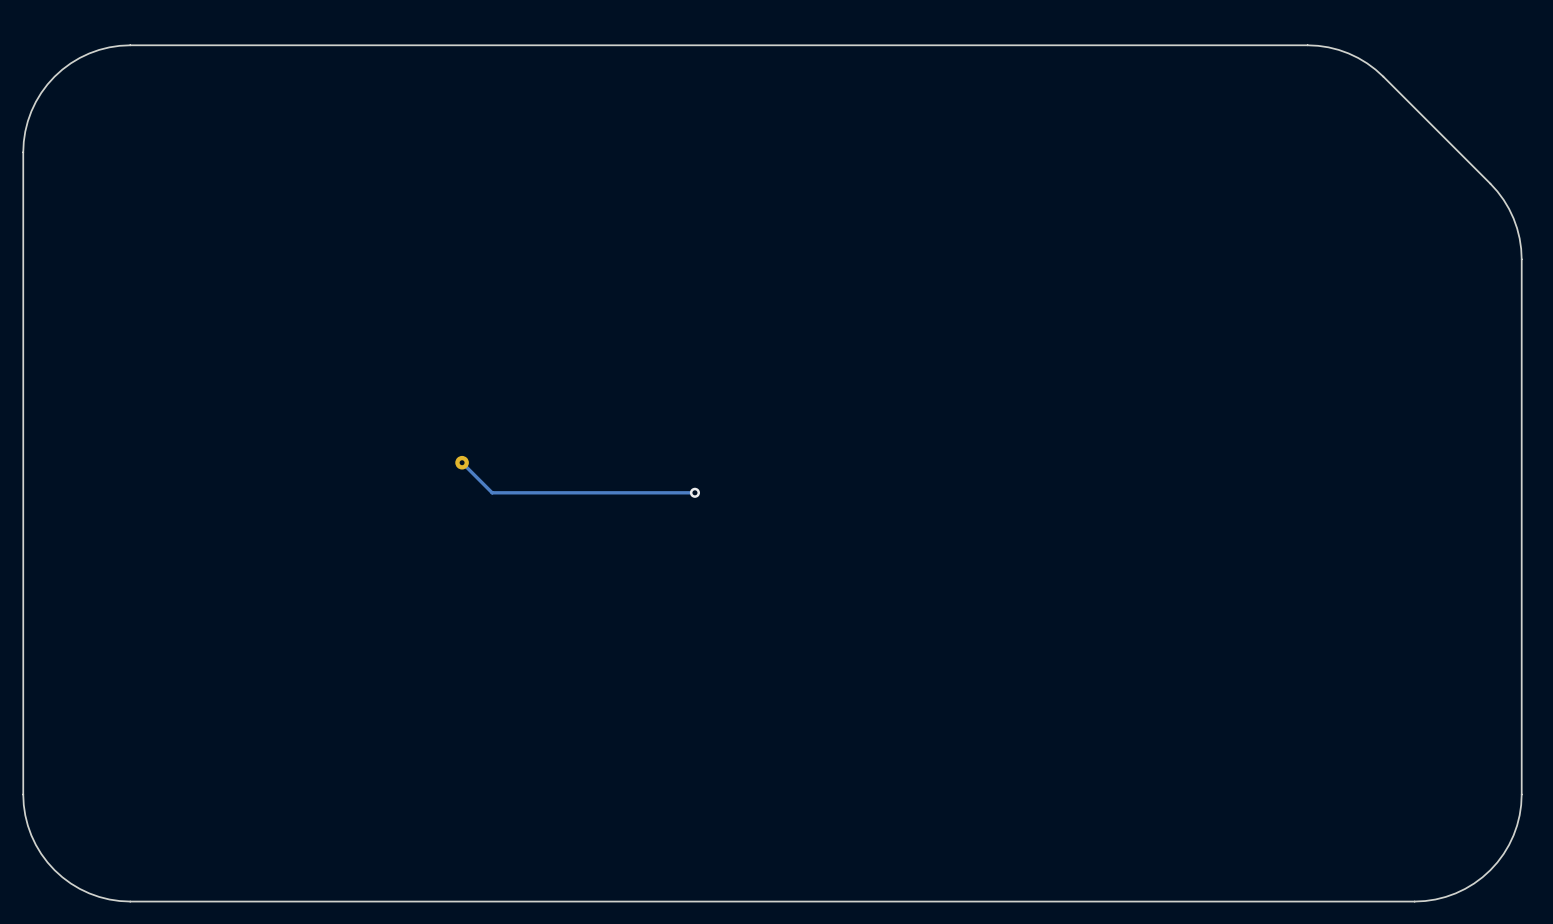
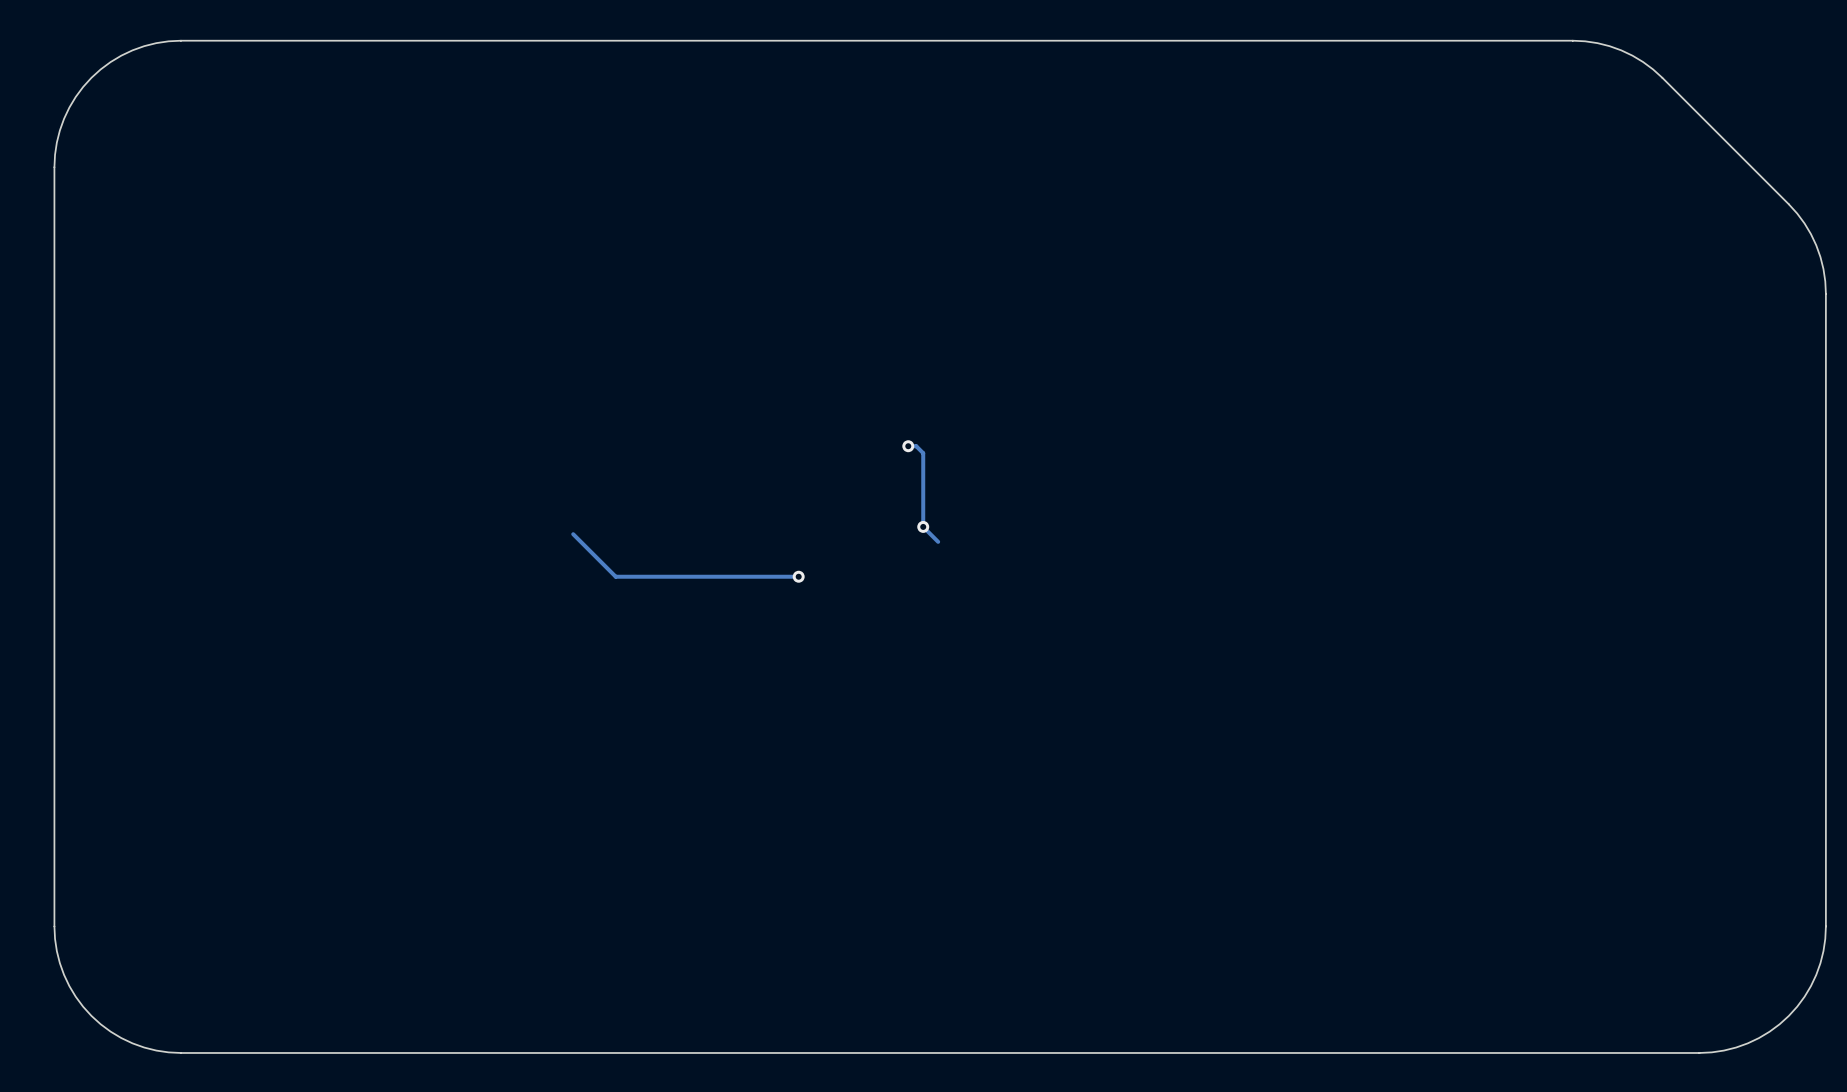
track: none -> (908, 446) (916, 446) (923, 453) (923, 526) (938, 541)
via: none -> (908, 446)
via: none -> (923, 526)
part: (462, 462) -> none
track: (694, 492) (492, 492) -> (798, 576) (615, 576) (608, 569)
via: (694, 492) -> none
via: none -> (798, 576)

